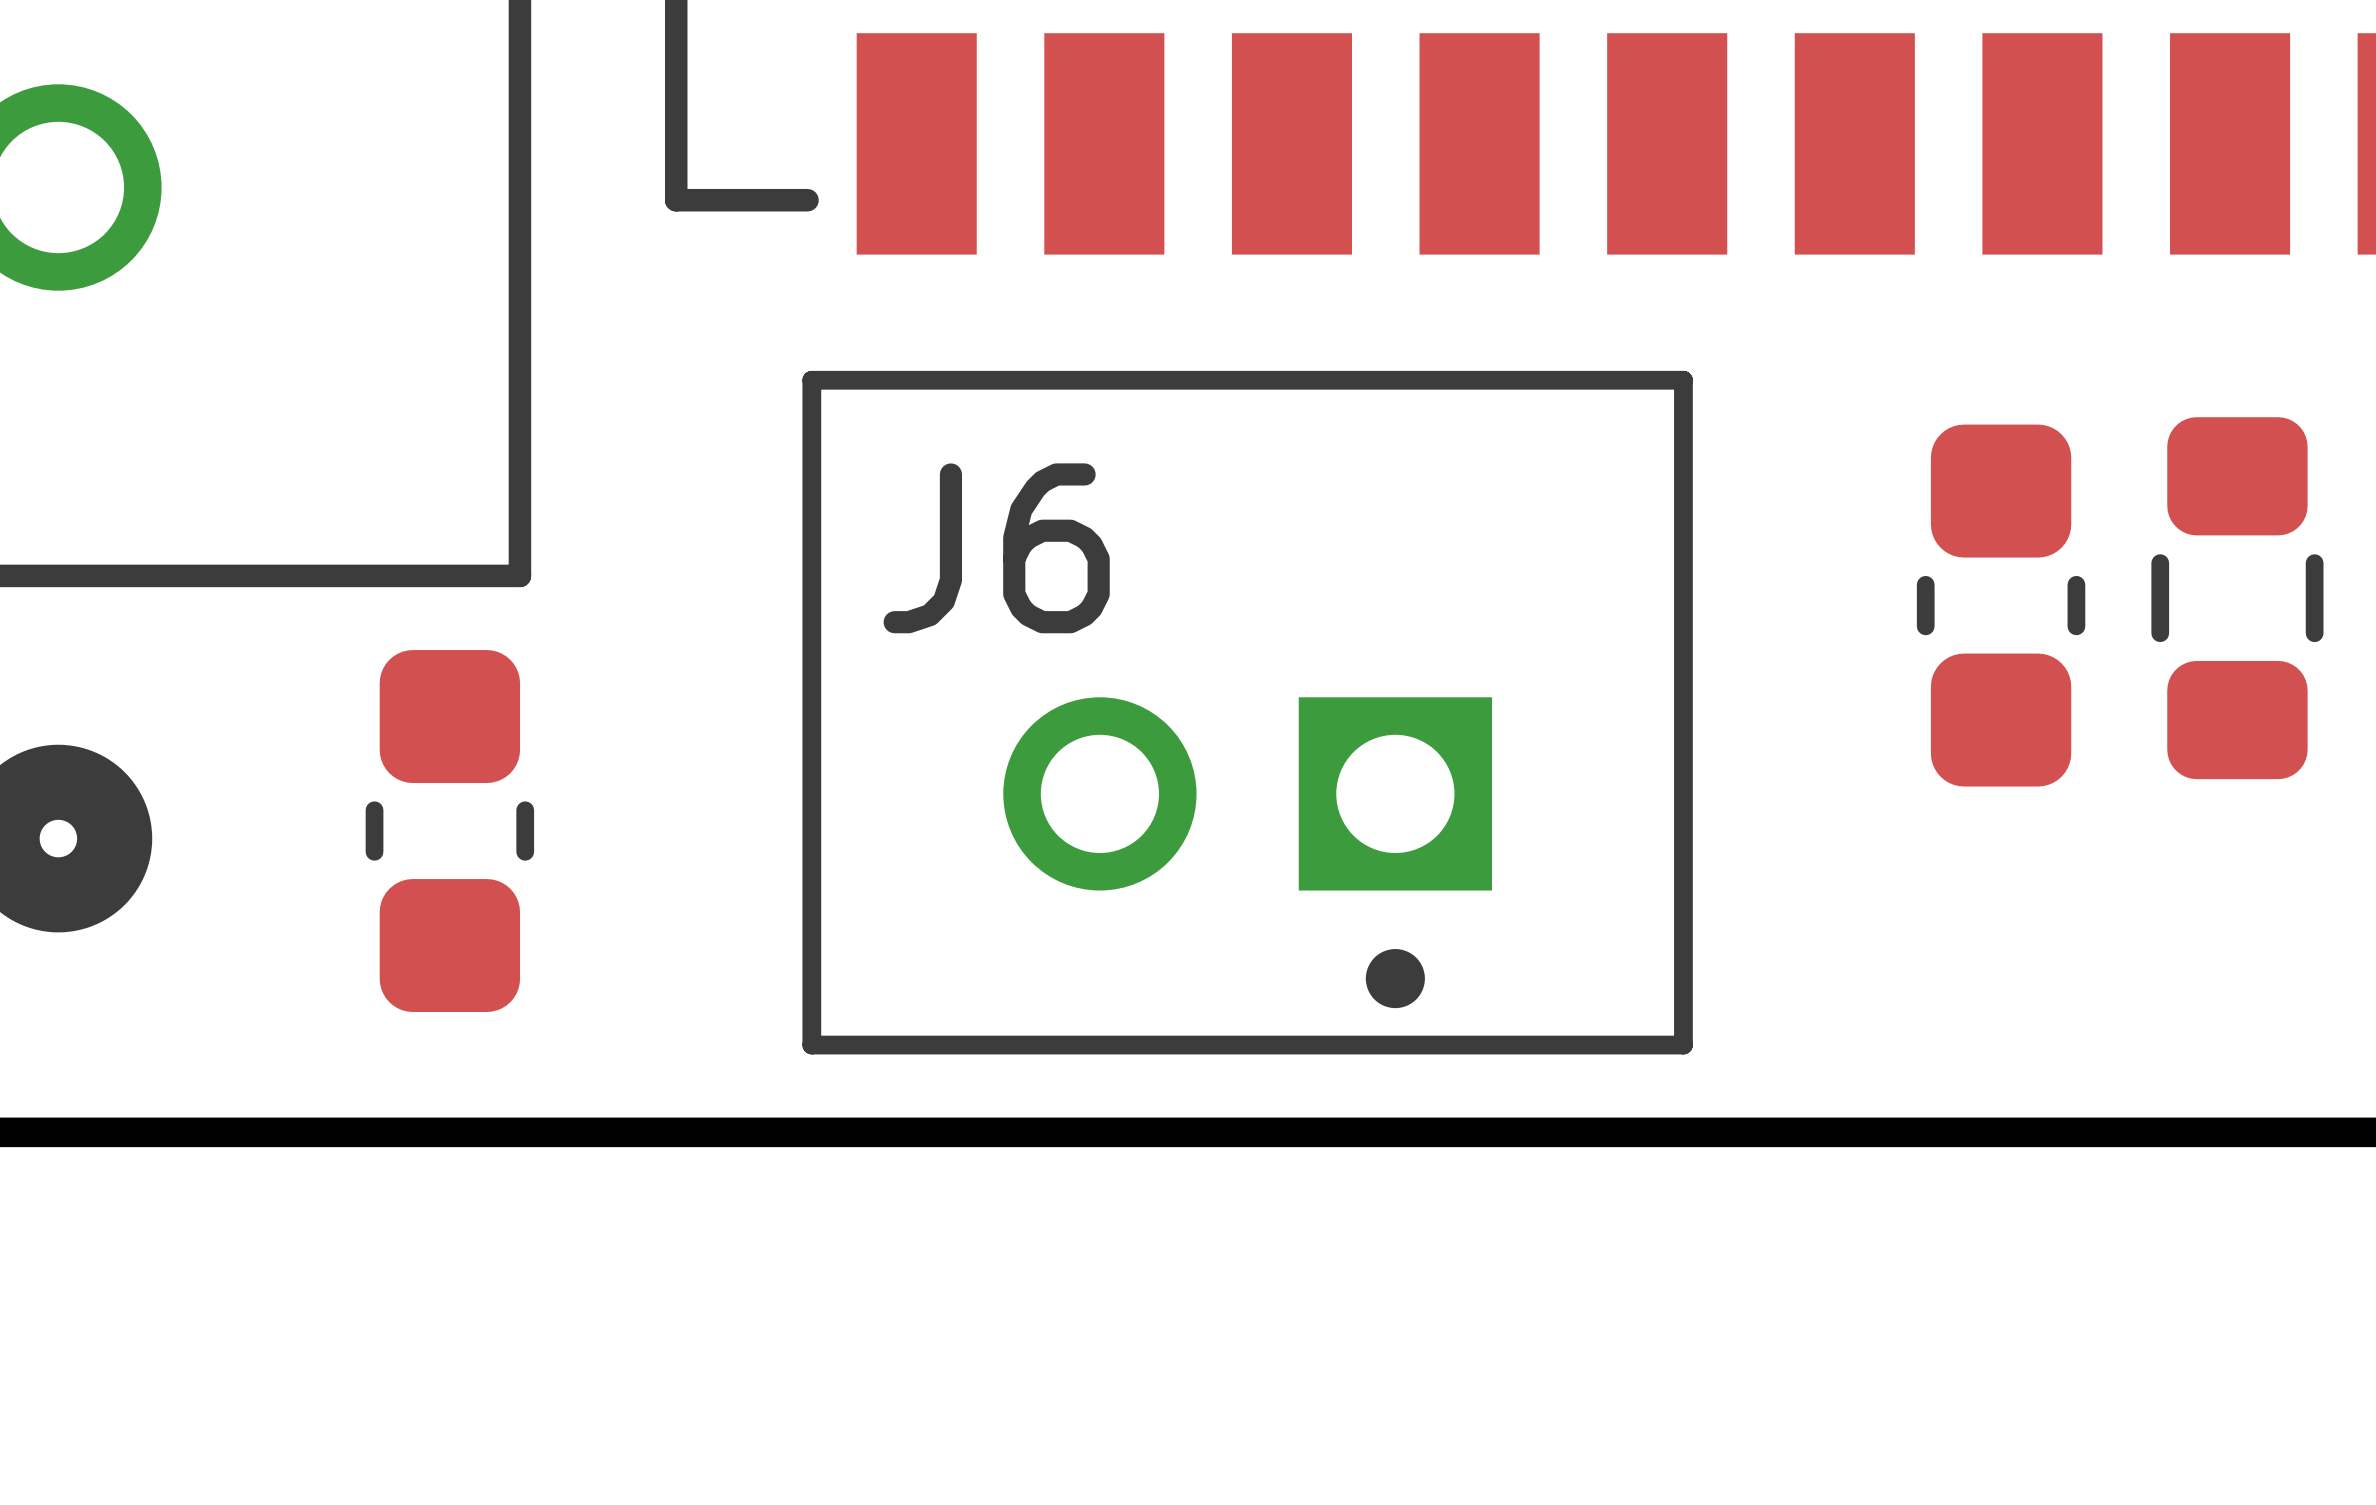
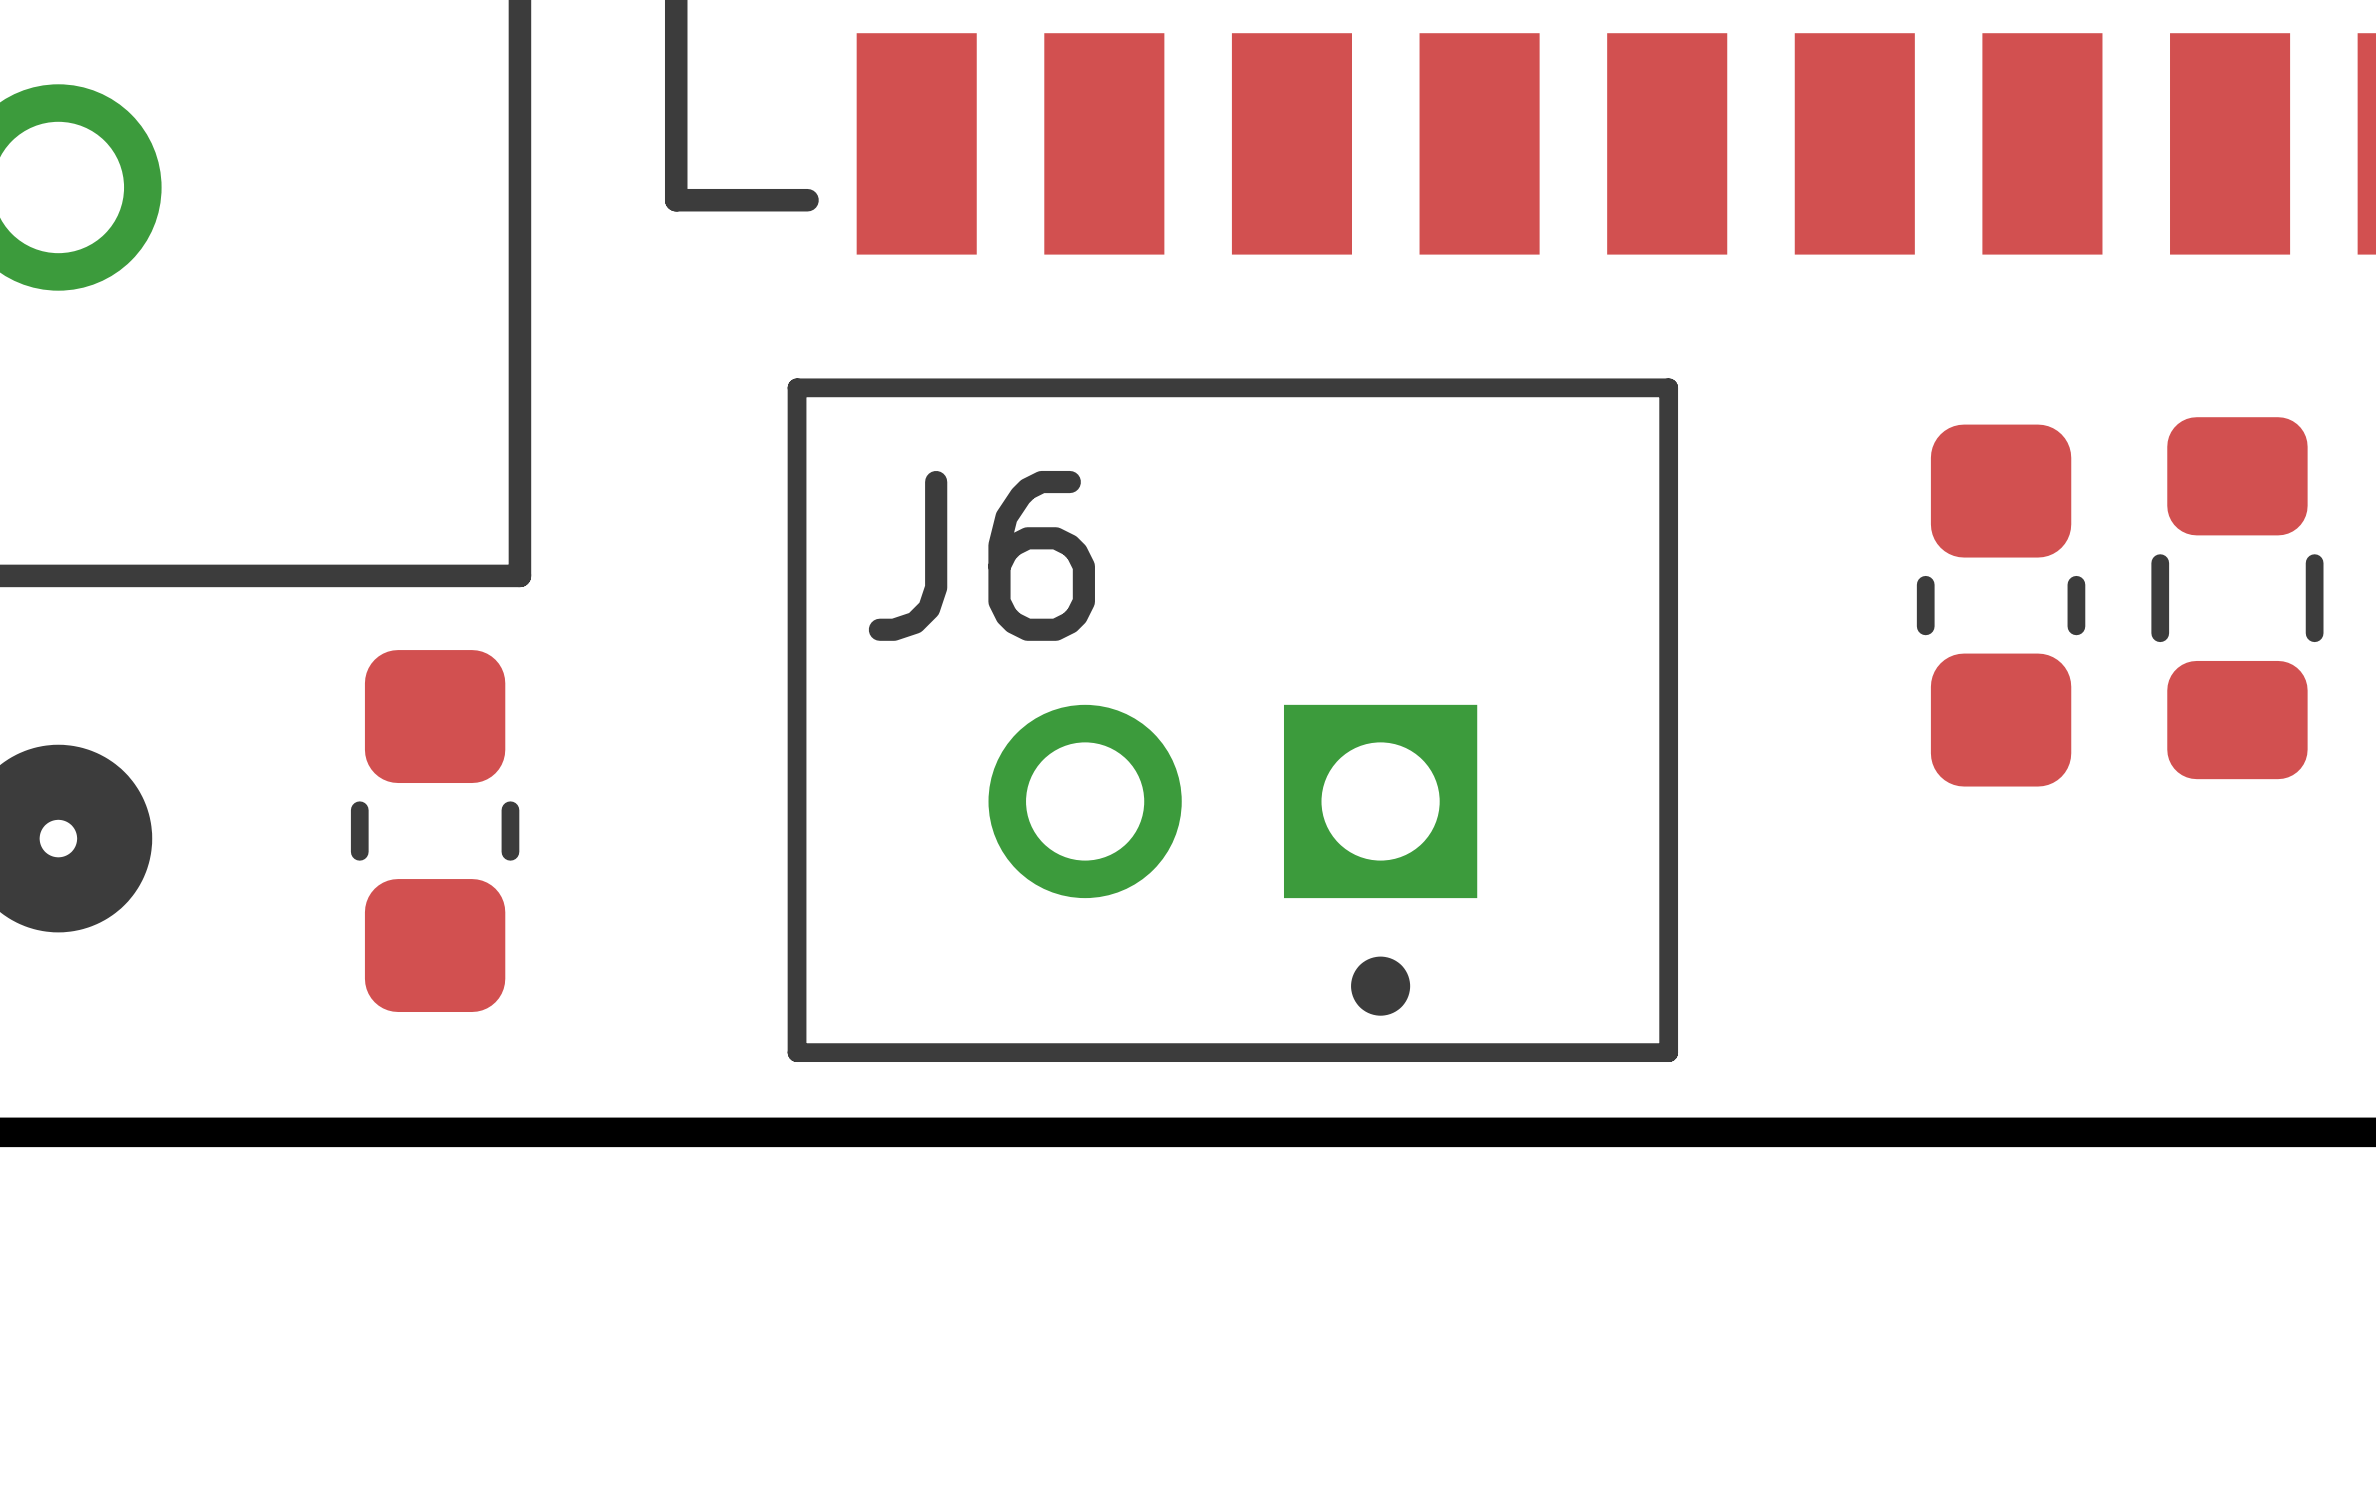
J6 position: (1247, 712) -> (1232, 720)
part position: (449, 831) -> (435, 831)

